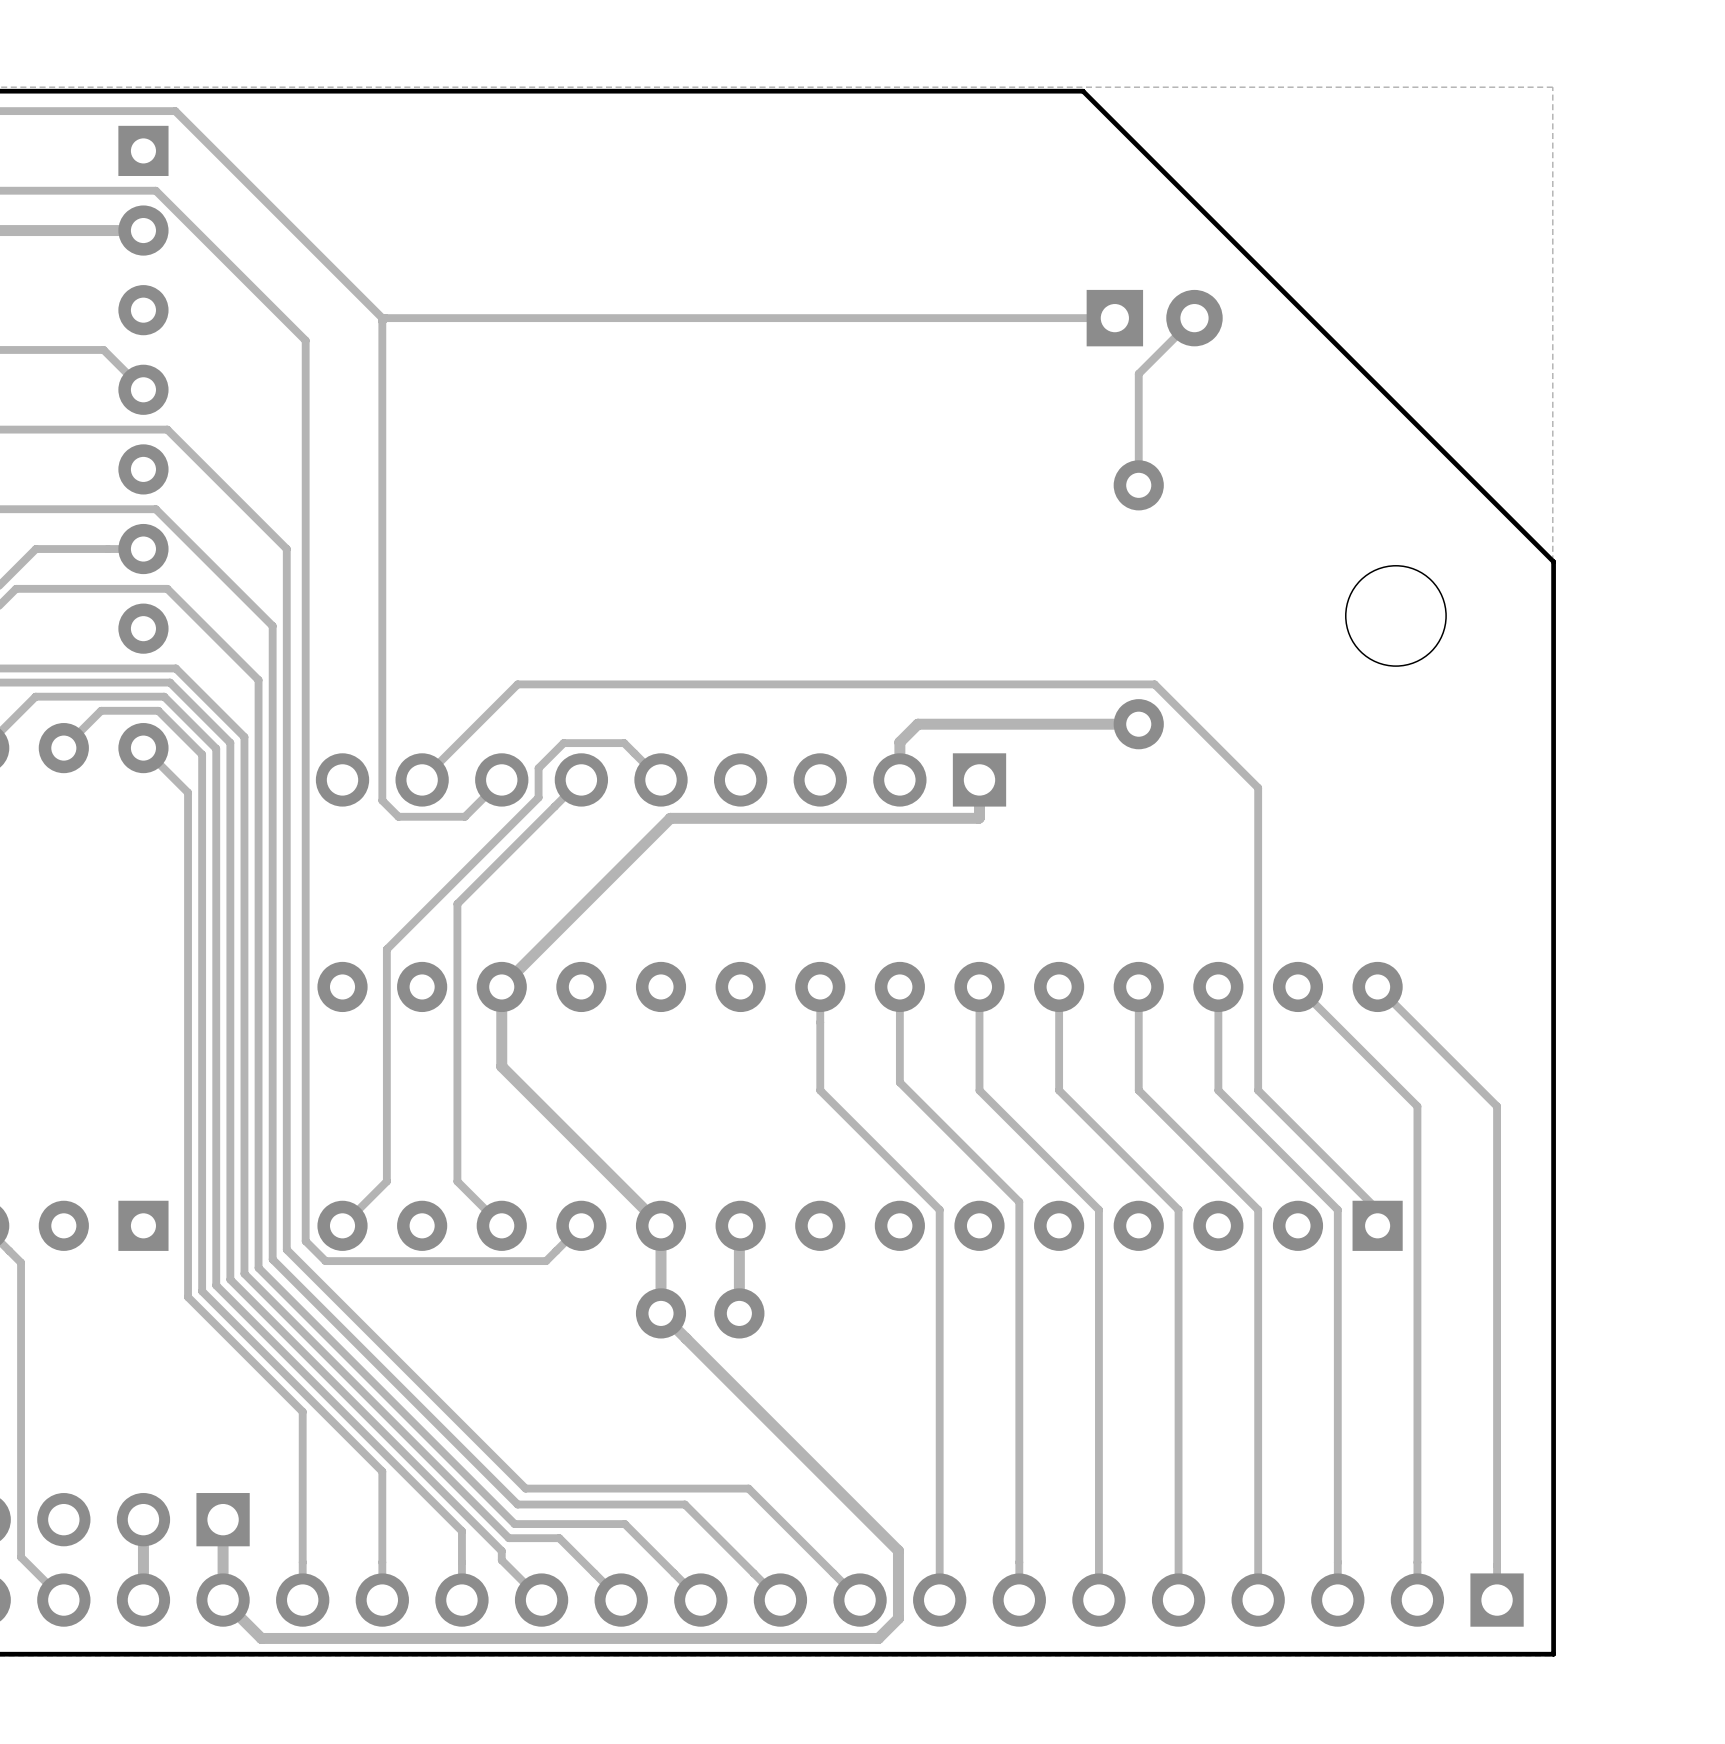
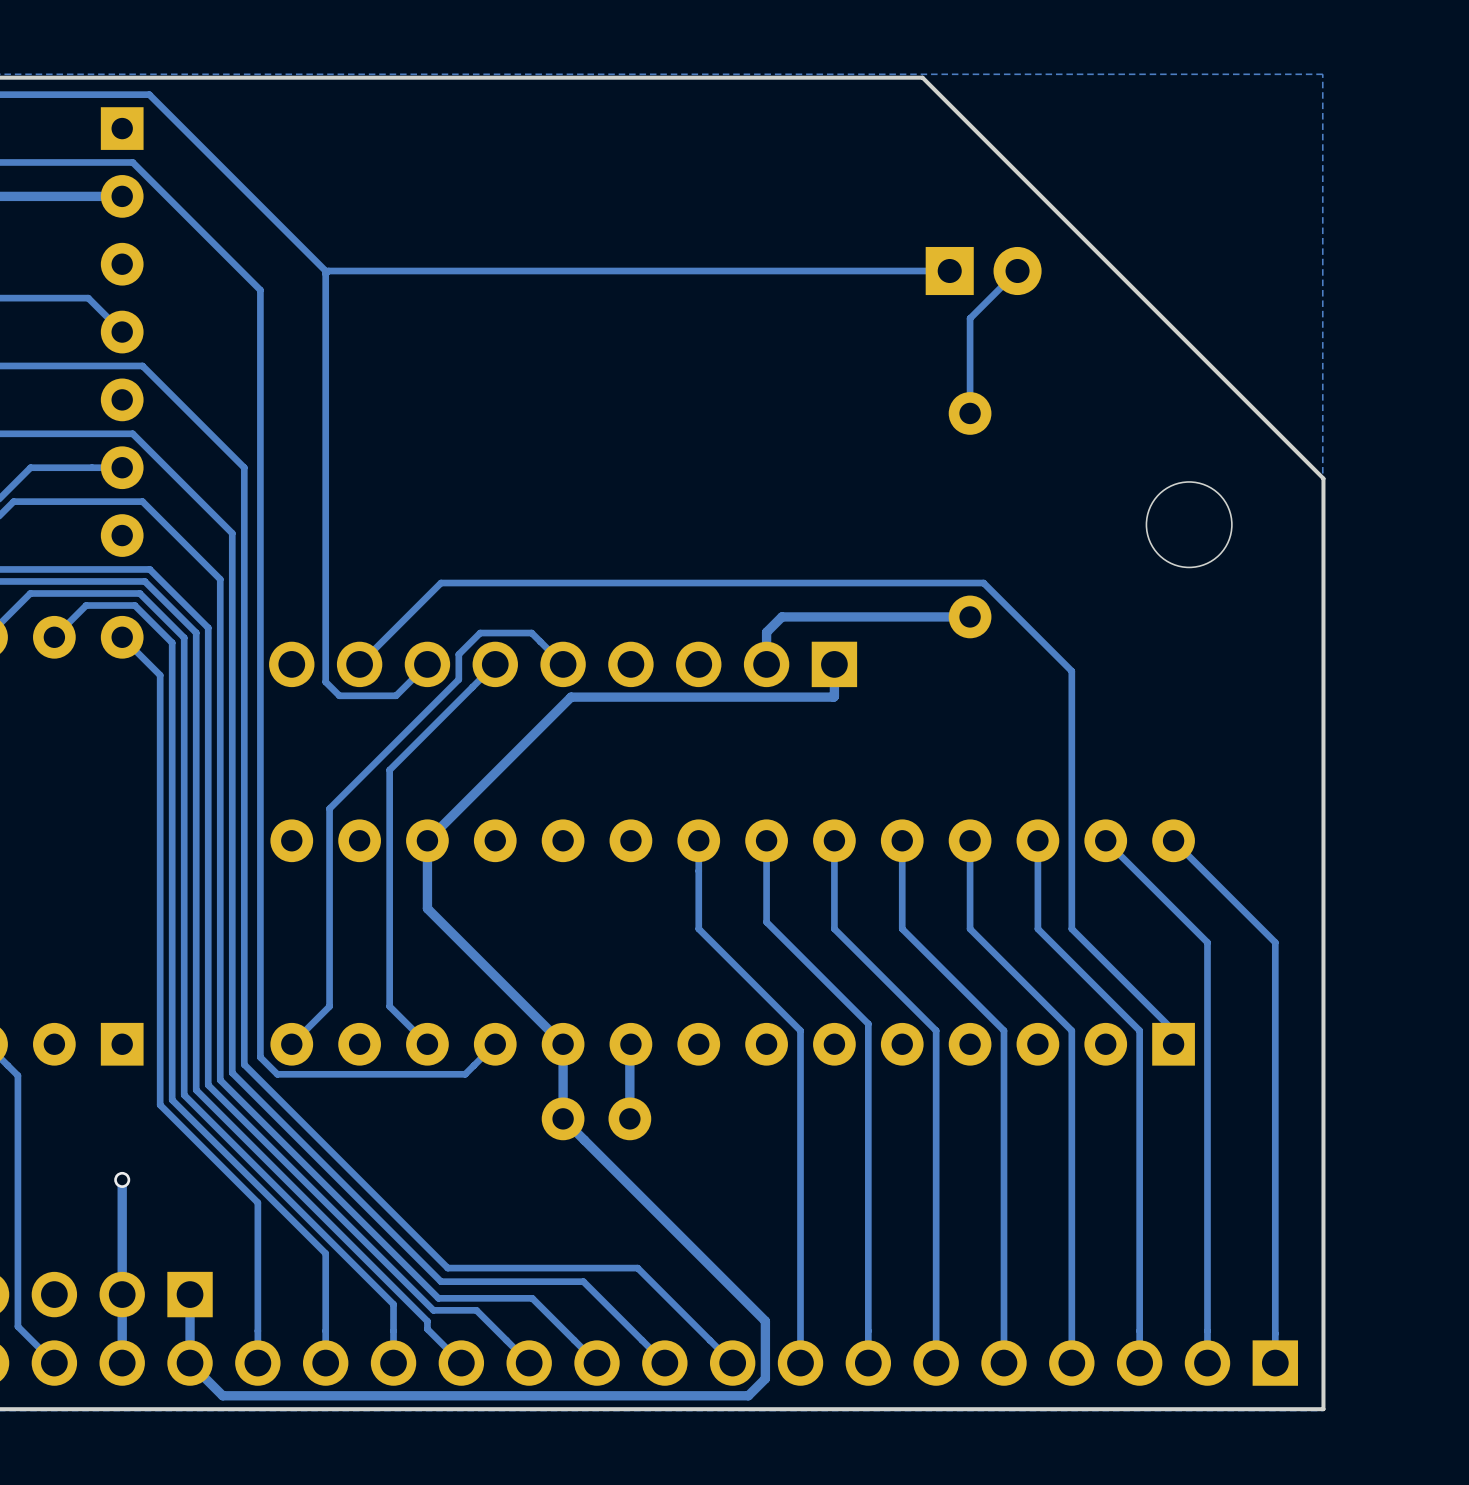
track: none -> (122, 1179) (122, 1294)
via: none -> (122, 1179)

